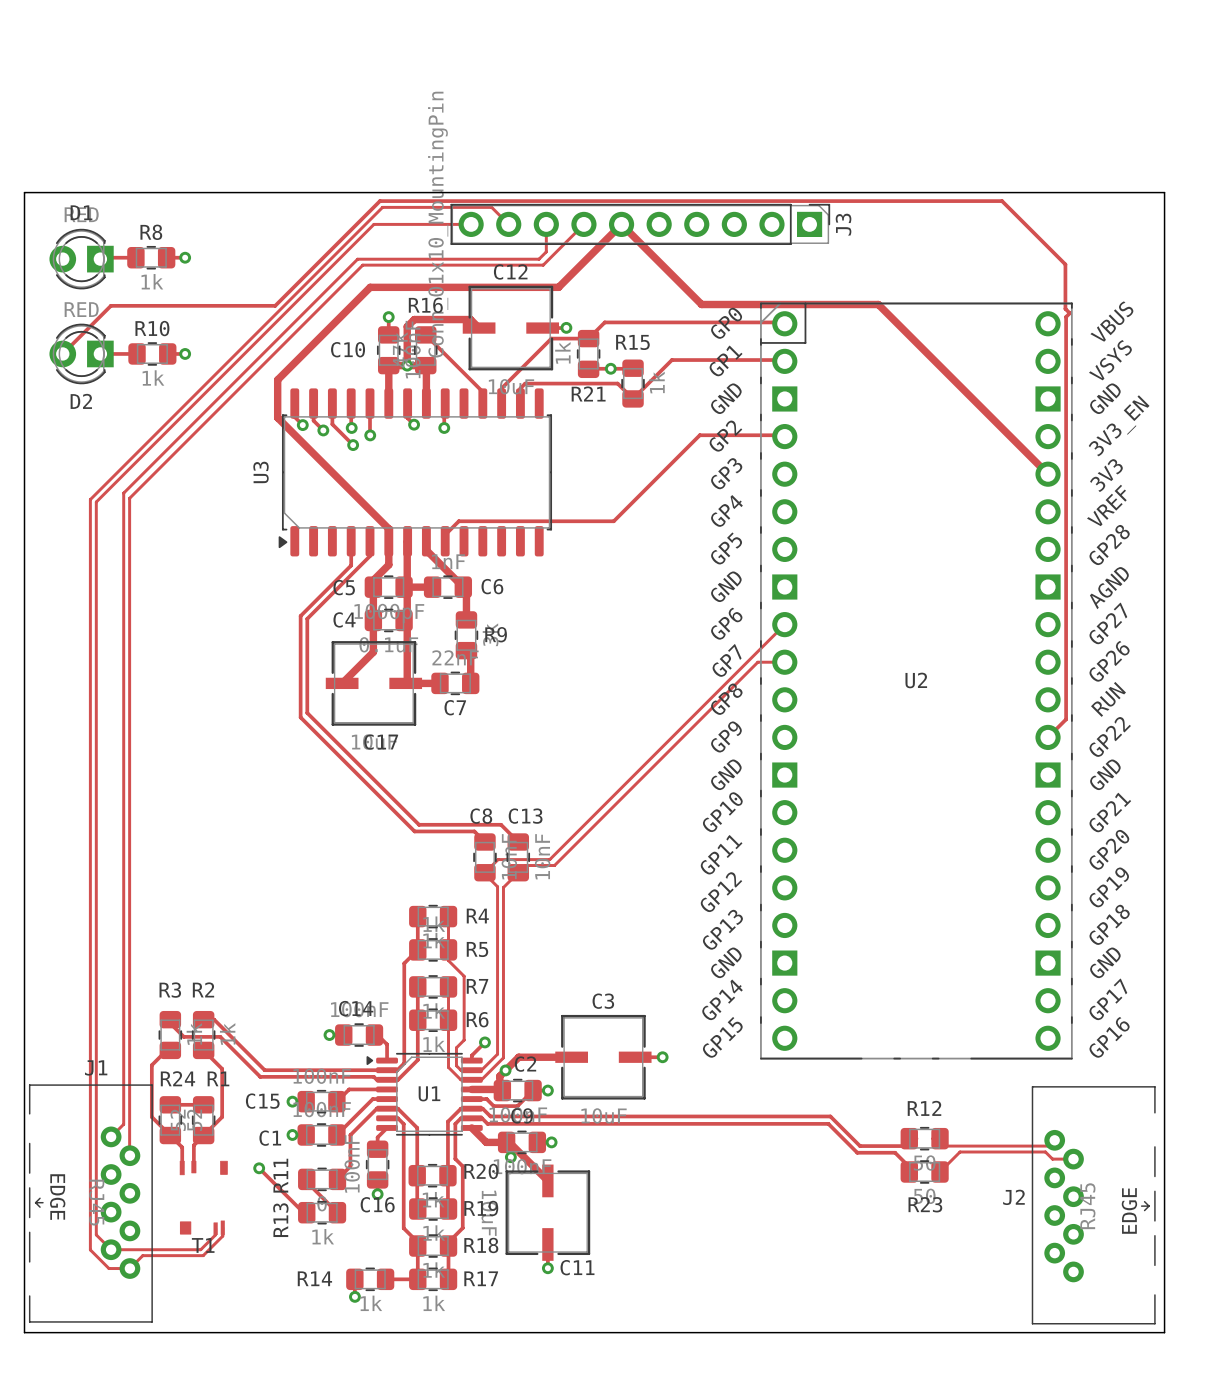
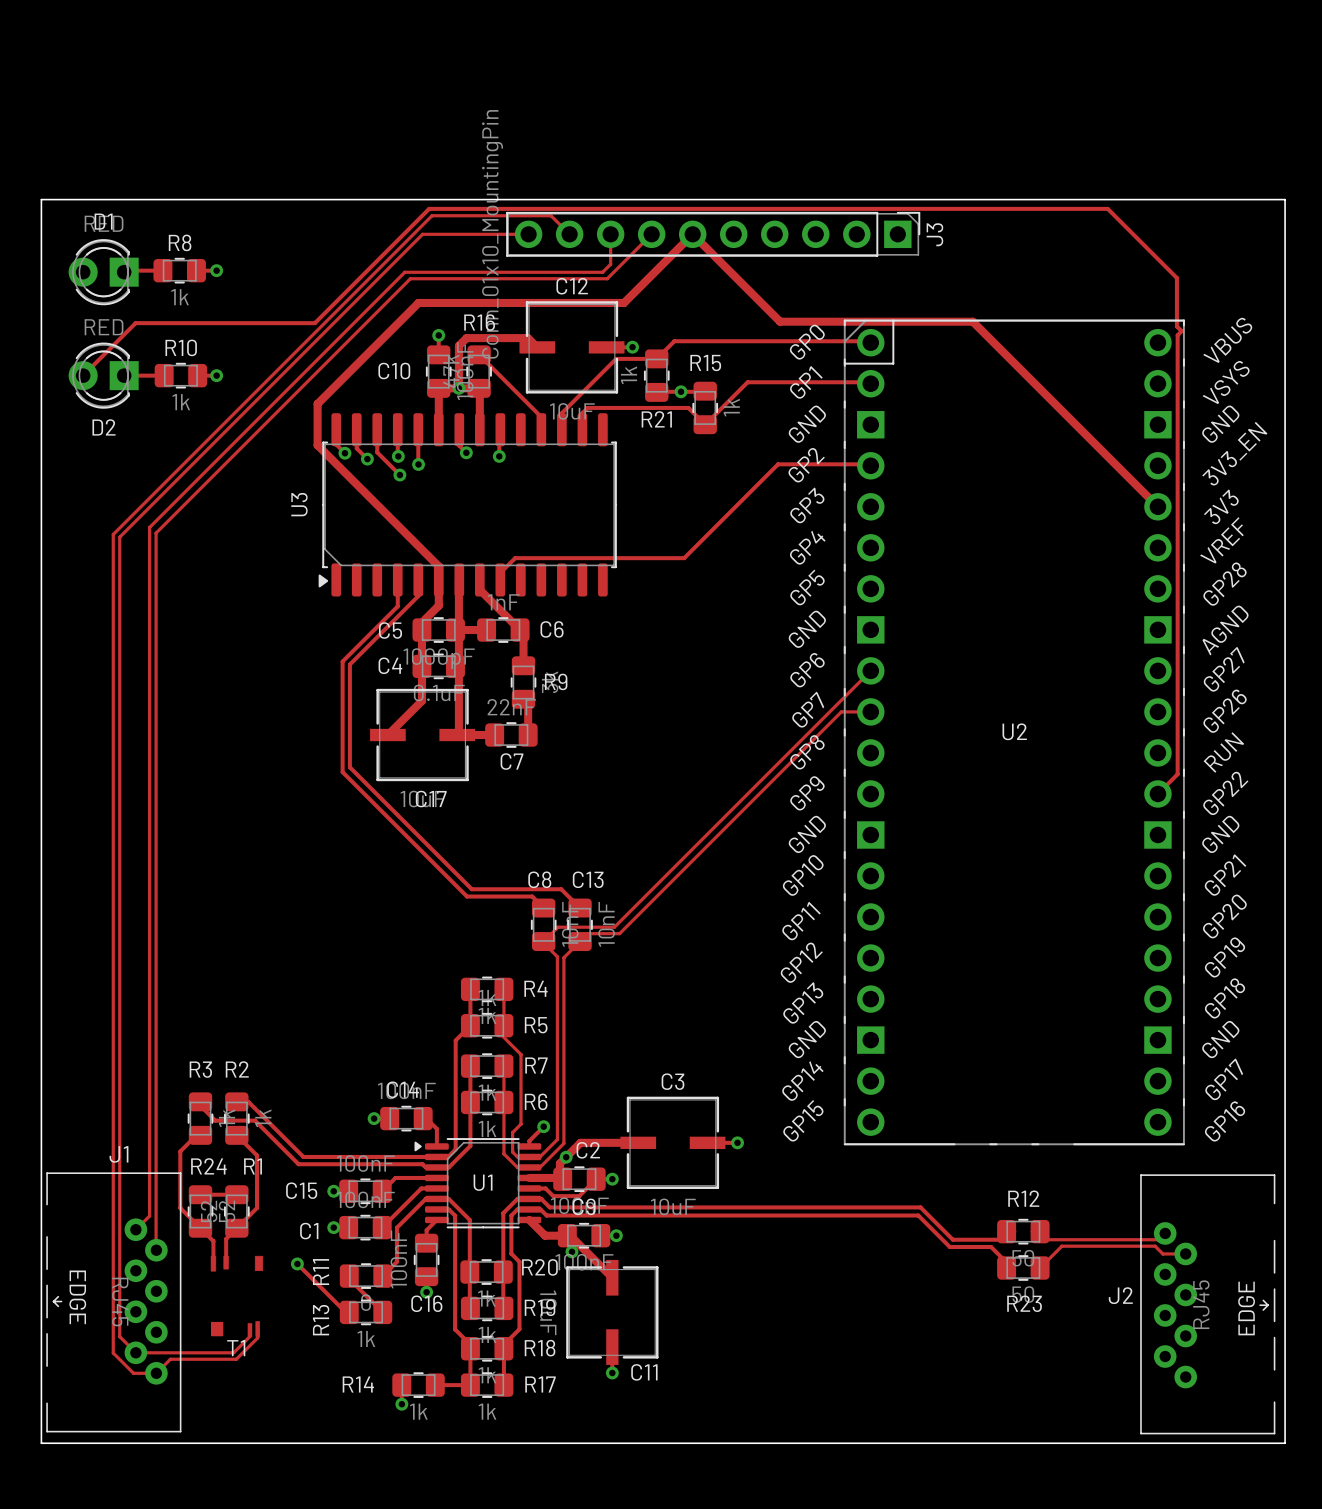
J1 footprint: [28, 1084, 153, 1323] -> [46, 1172, 182, 1433]
J2 footprint: [1031, 1086, 1156, 1325] -> [1140, 1174, 1276, 1435]

